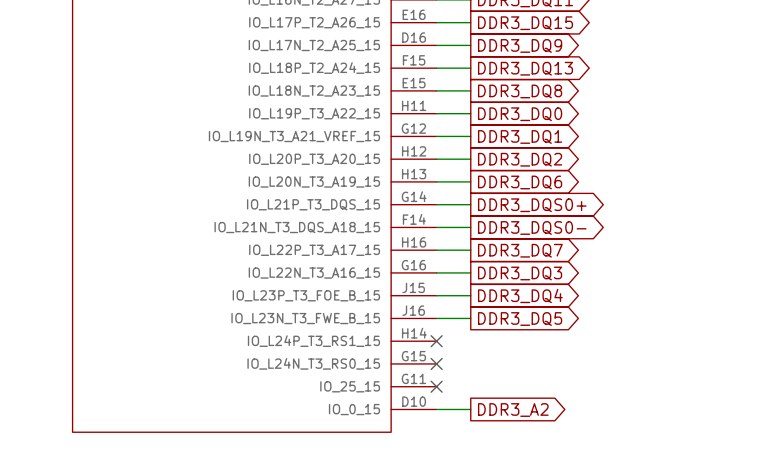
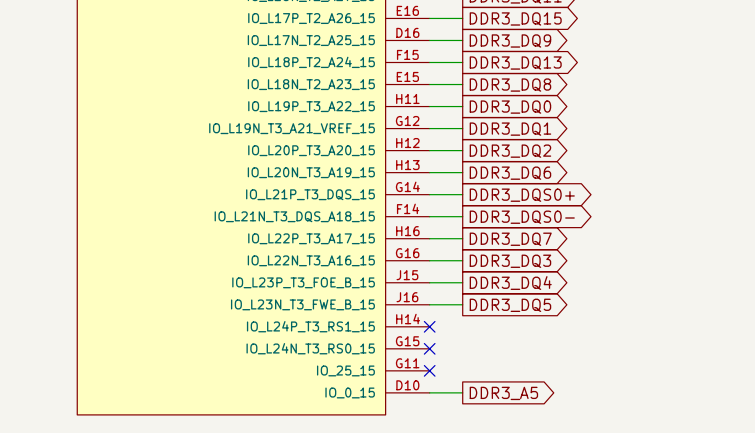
global label: DDR3_A2 (513, 410) -> DDR3_A5 (503, 393)

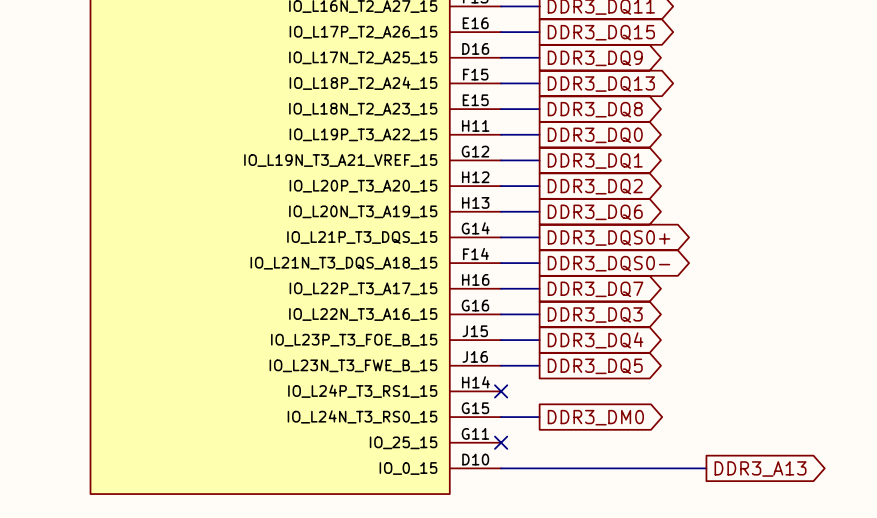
wire: none -> (501, 417) (539, 417)
no-connect mark: (429, 348) -> none
global label: none -> DDR3_DM0 (595, 417)
wire: none -> (539, 468) (706, 468)
global label: DDR3_A5 (503, 393) -> none
global label: none -> DDR3_A13 (760, 469)

